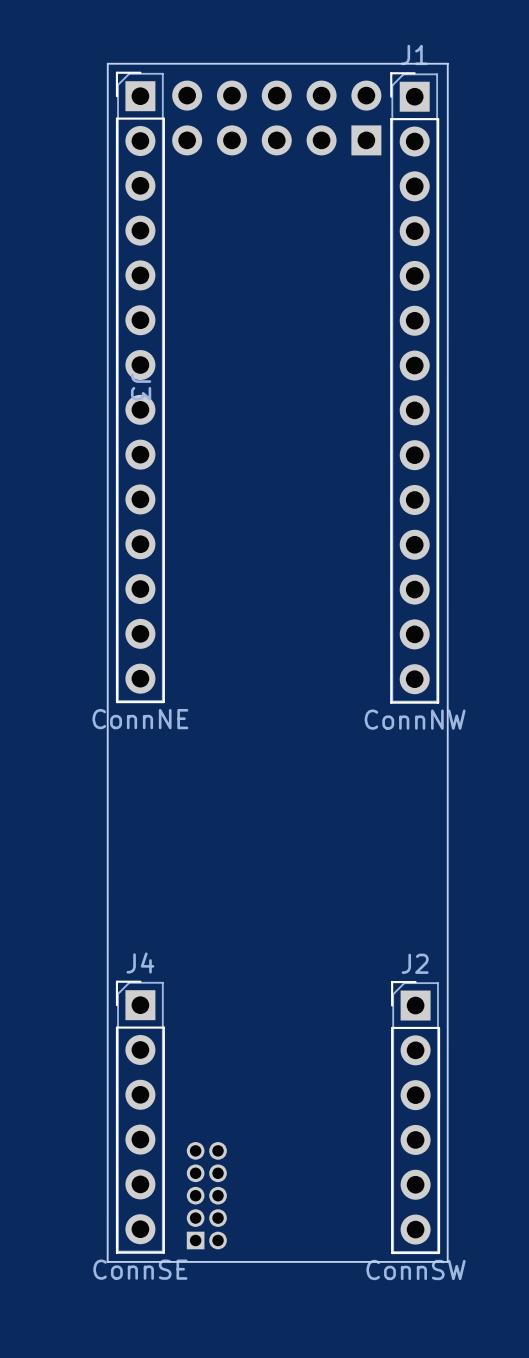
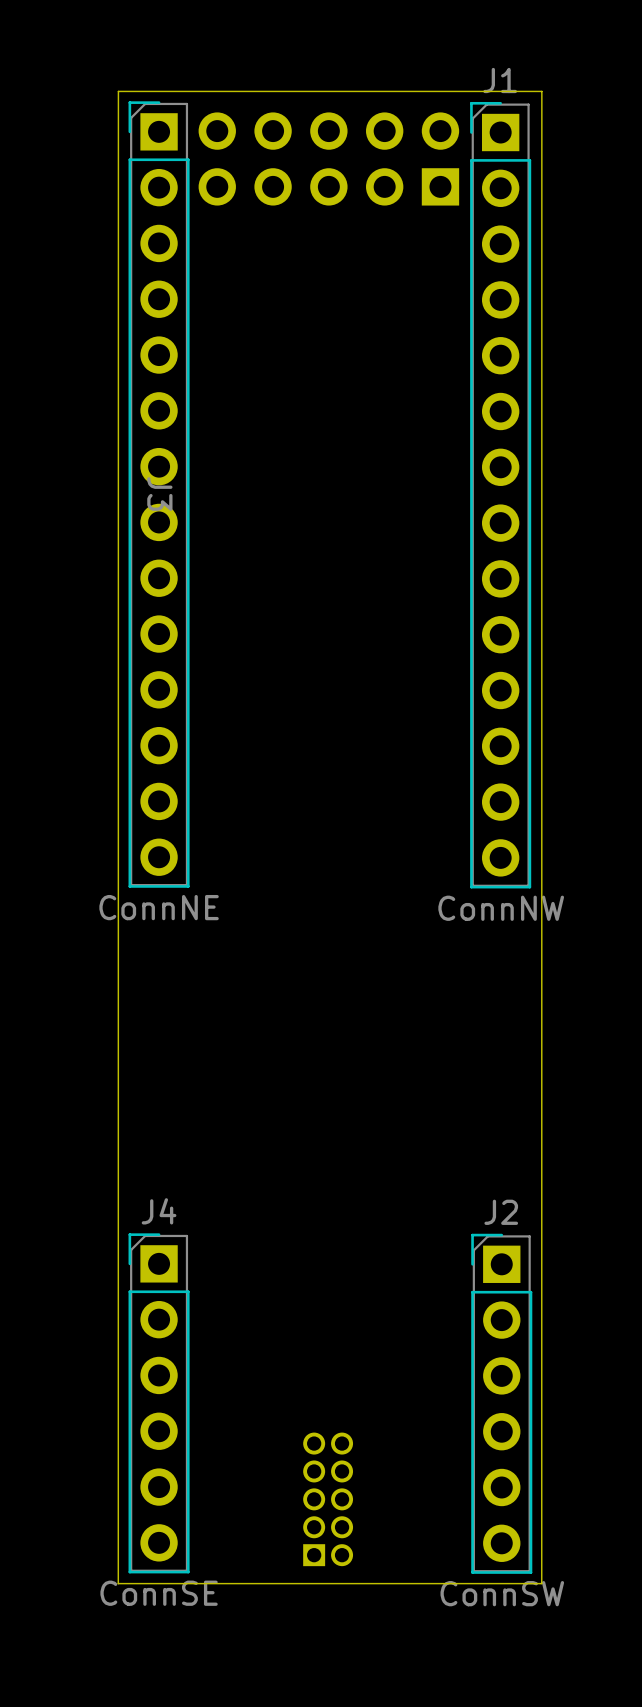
part position: (206, 1195) -> (328, 1499)

